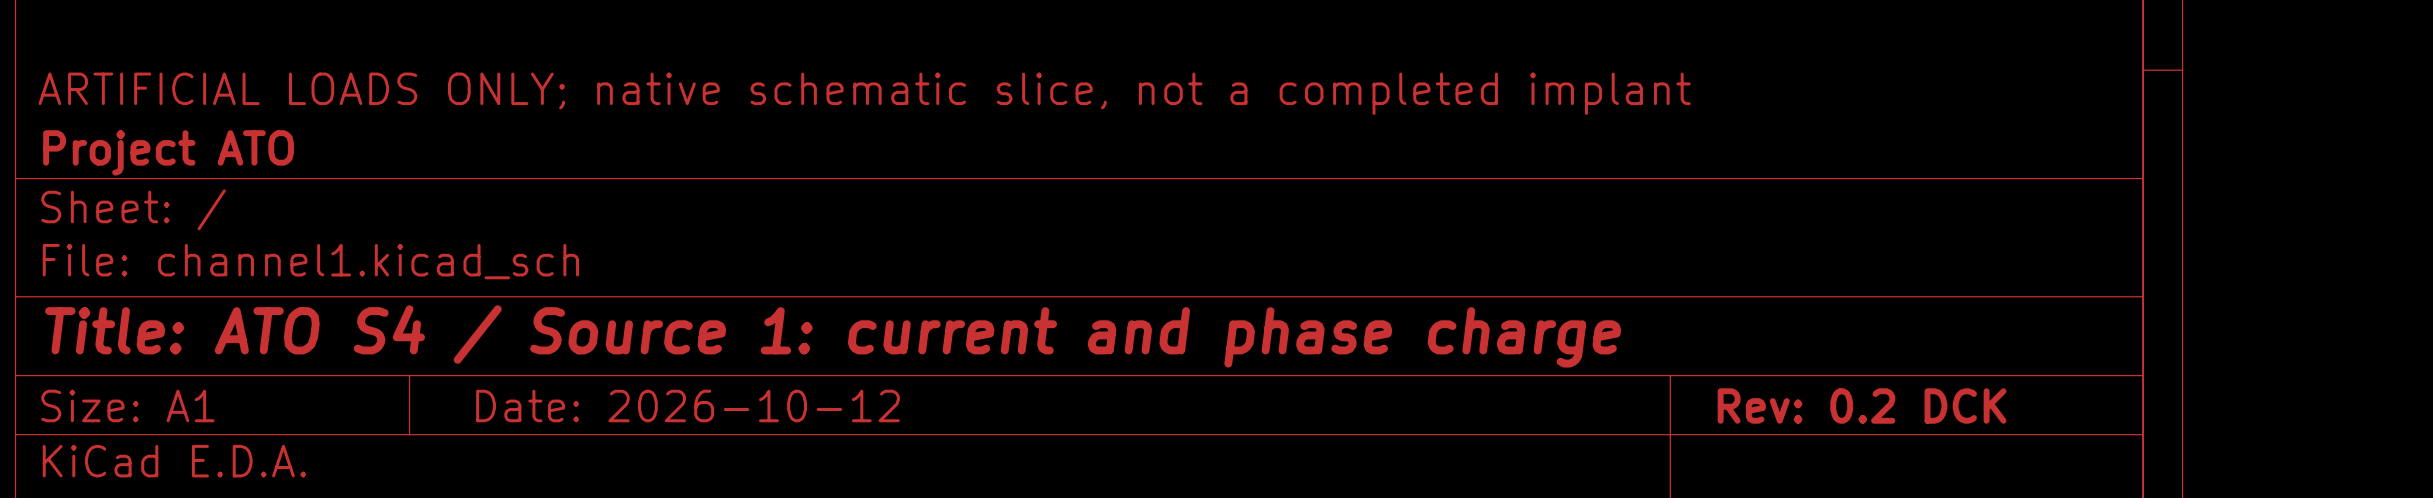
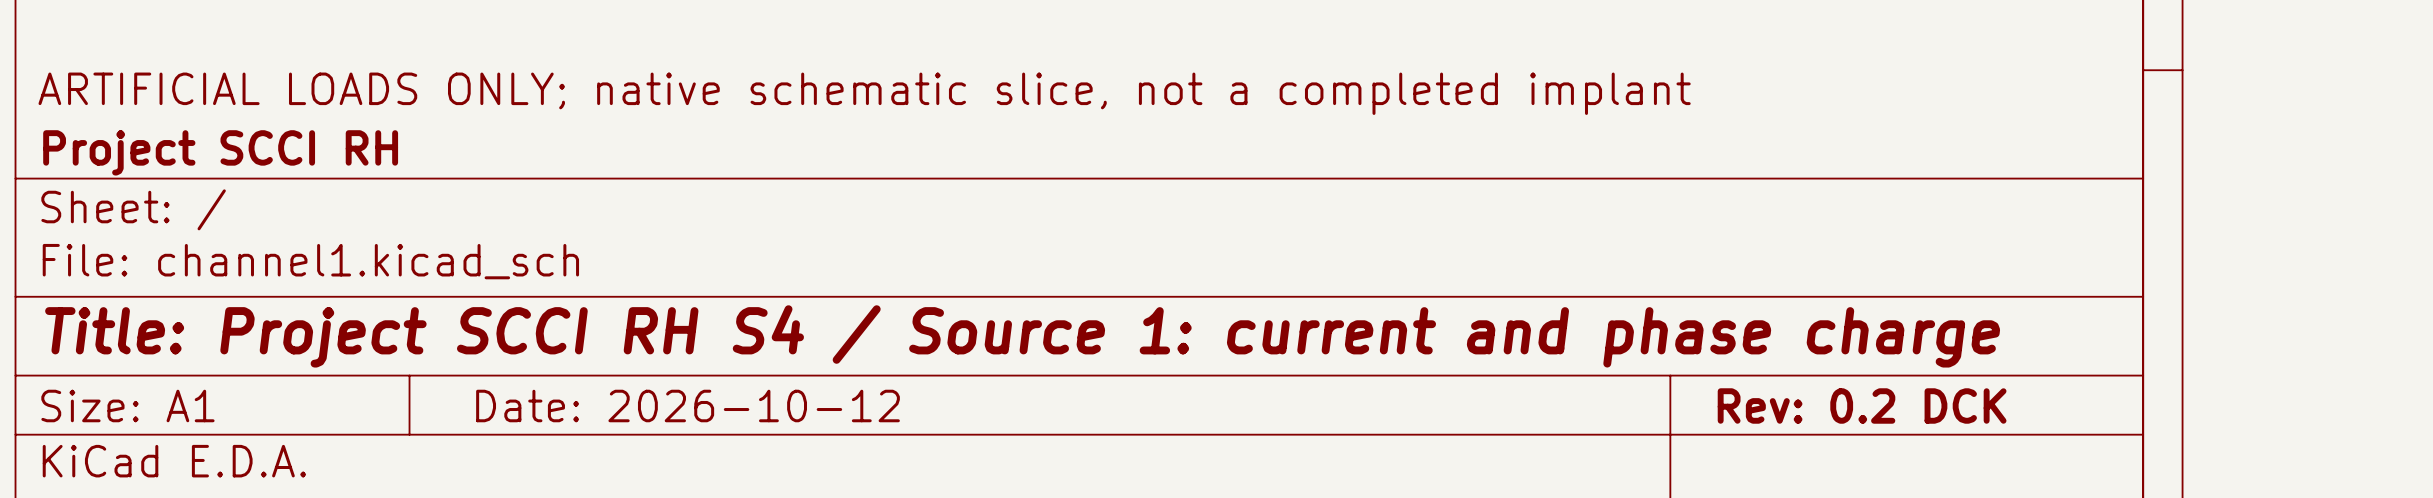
title block: Project ATO (168, 152) -> Project SCCI RH (220, 152)
title block: Title: ATO S4 / Source 1: current and phase charge (833, 336) -> Title: Project SCCI RH S4 / Source 1: current and phase charge (1022, 336)

